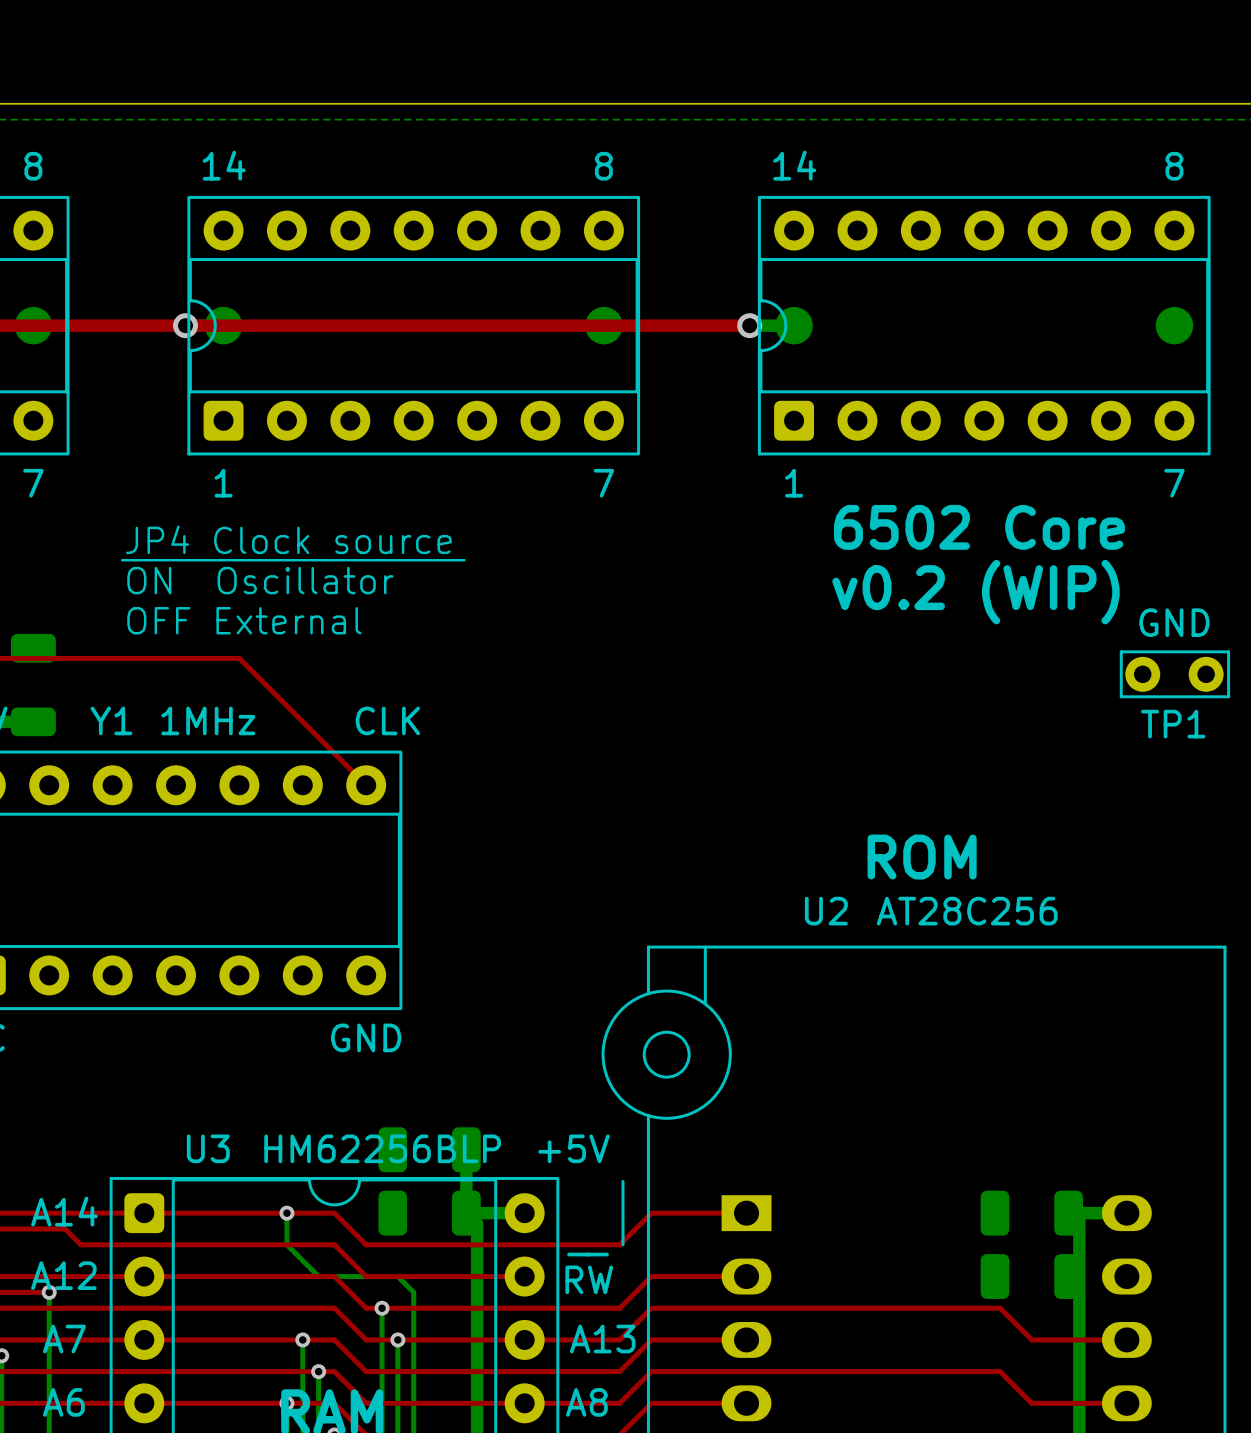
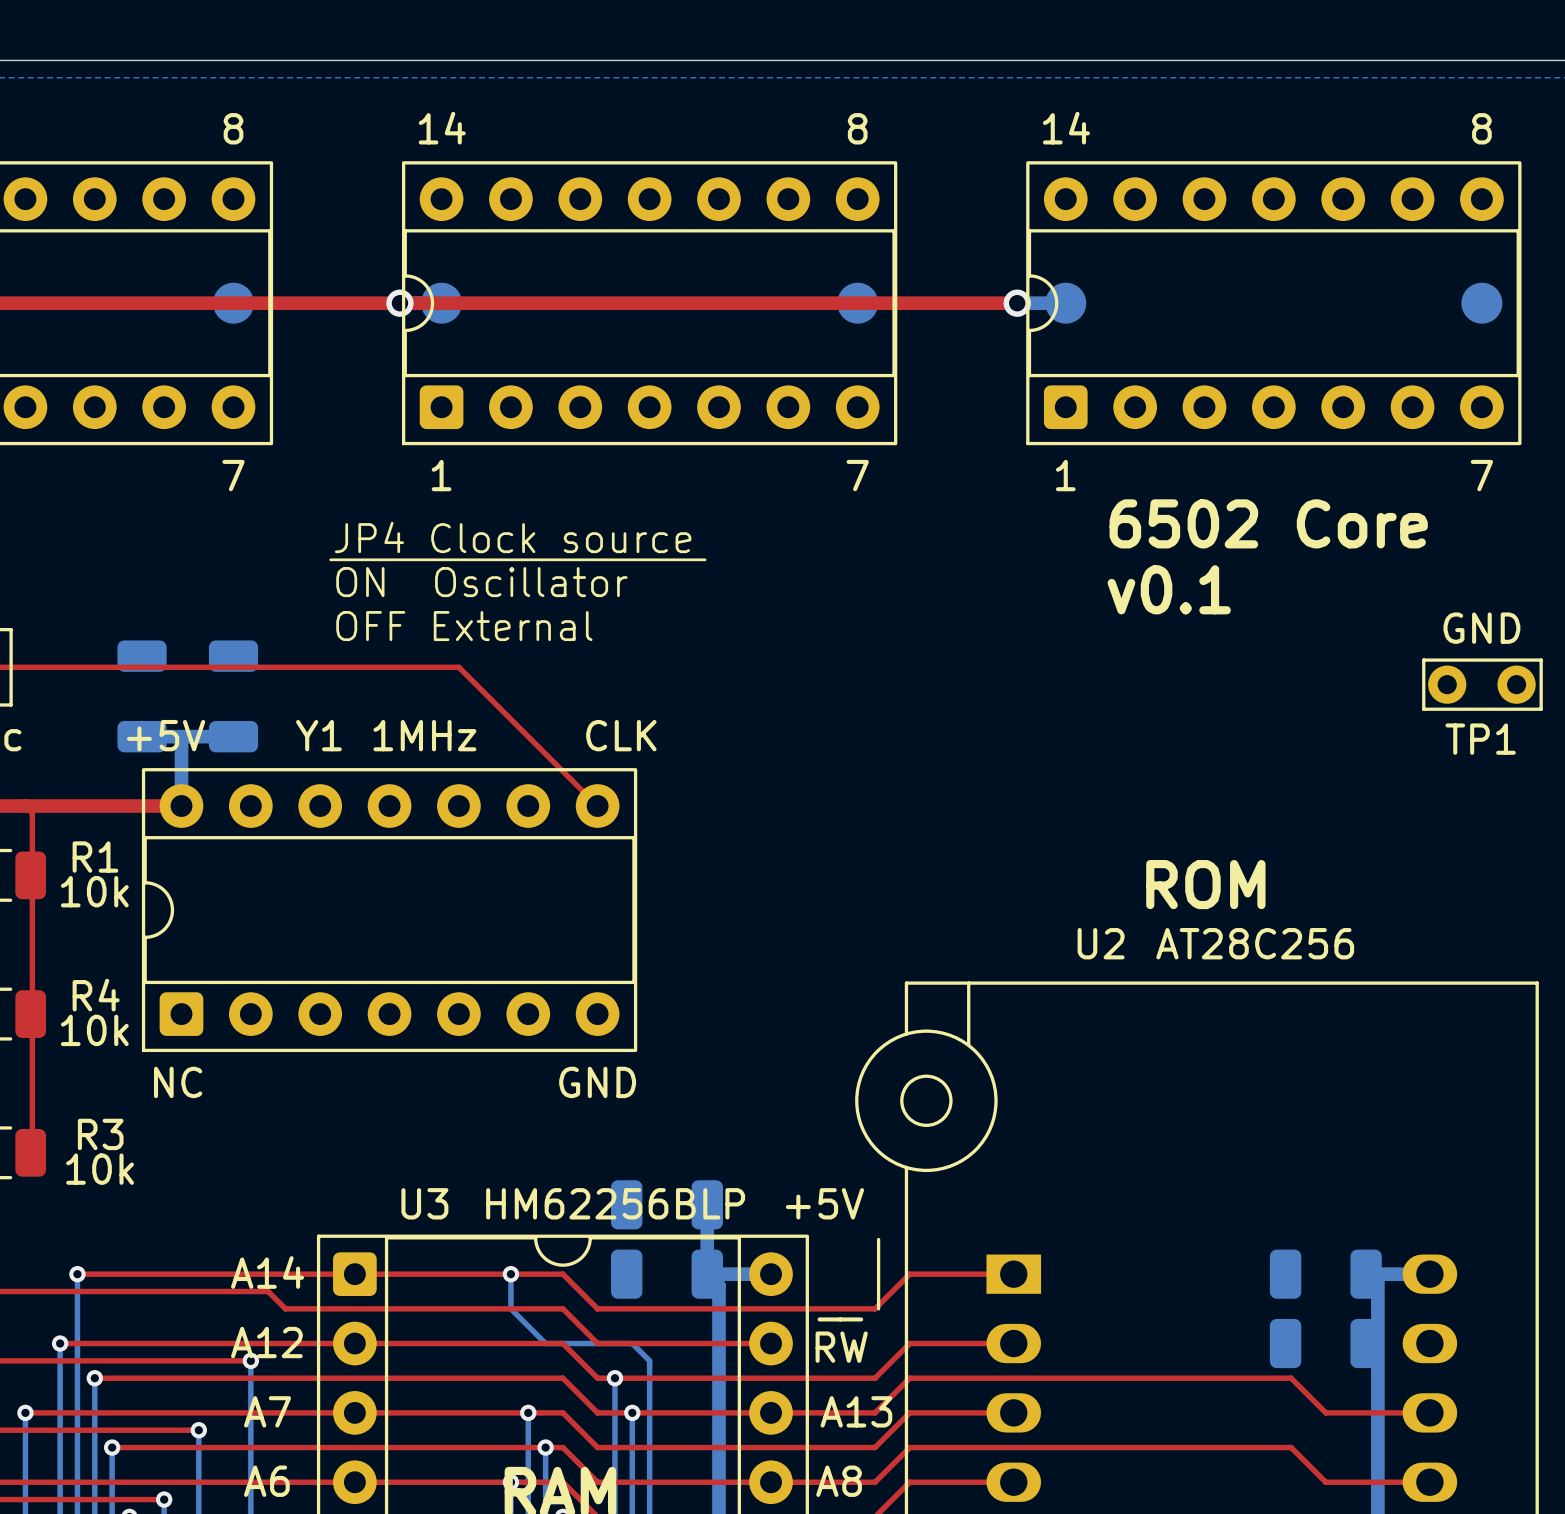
text: v0.2 (WIP) (975, 592) -> v0.1 (1169, 589)

